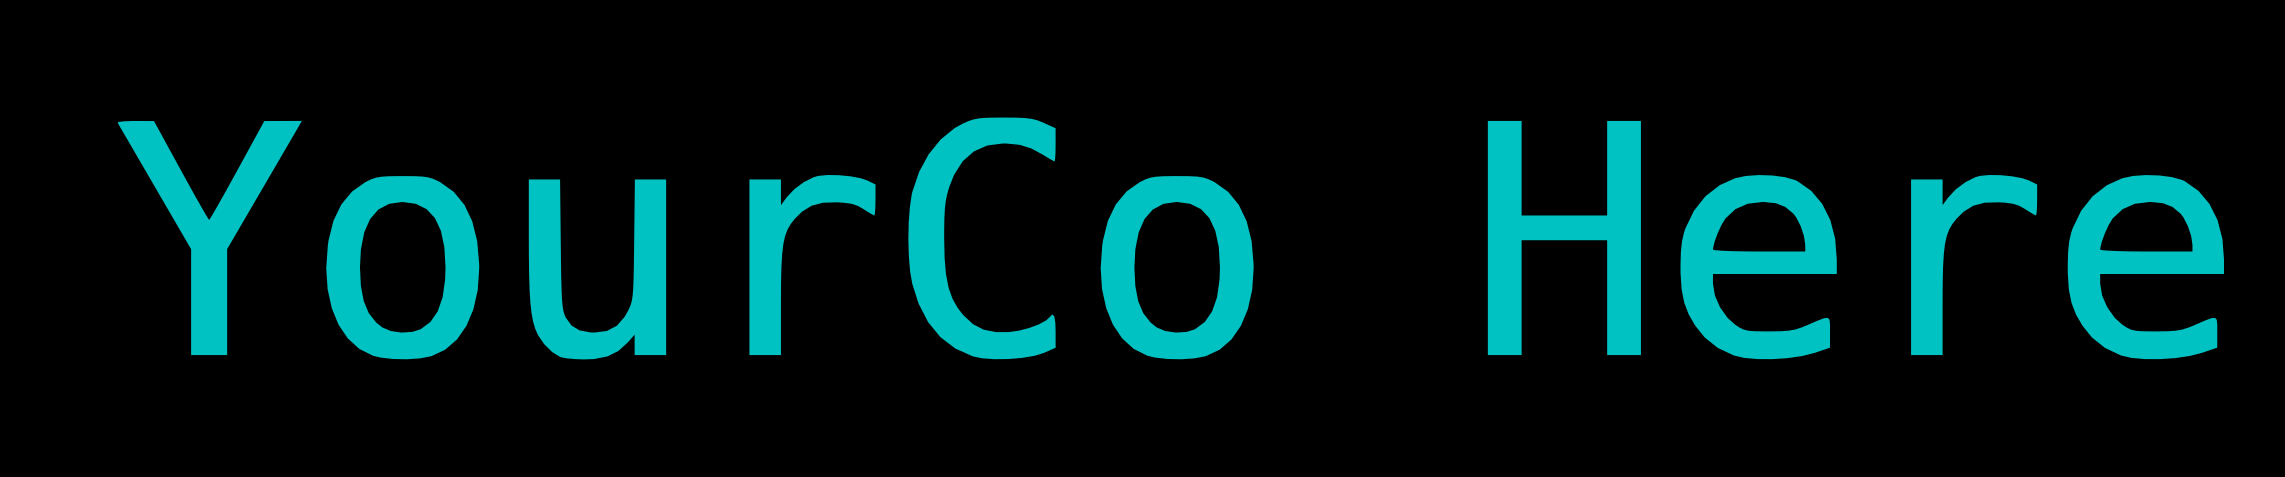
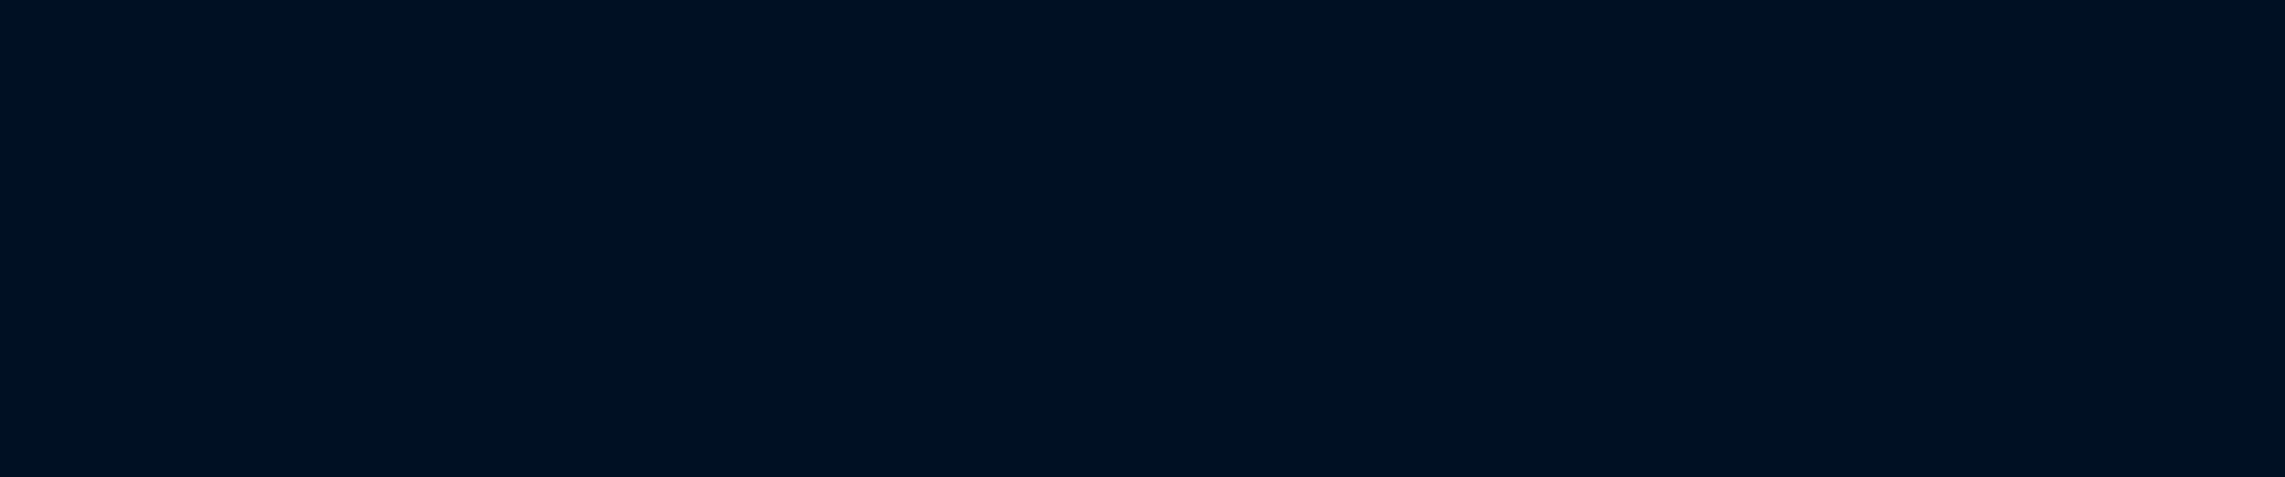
drawing: [117, 117, 2225, 360] -> none

